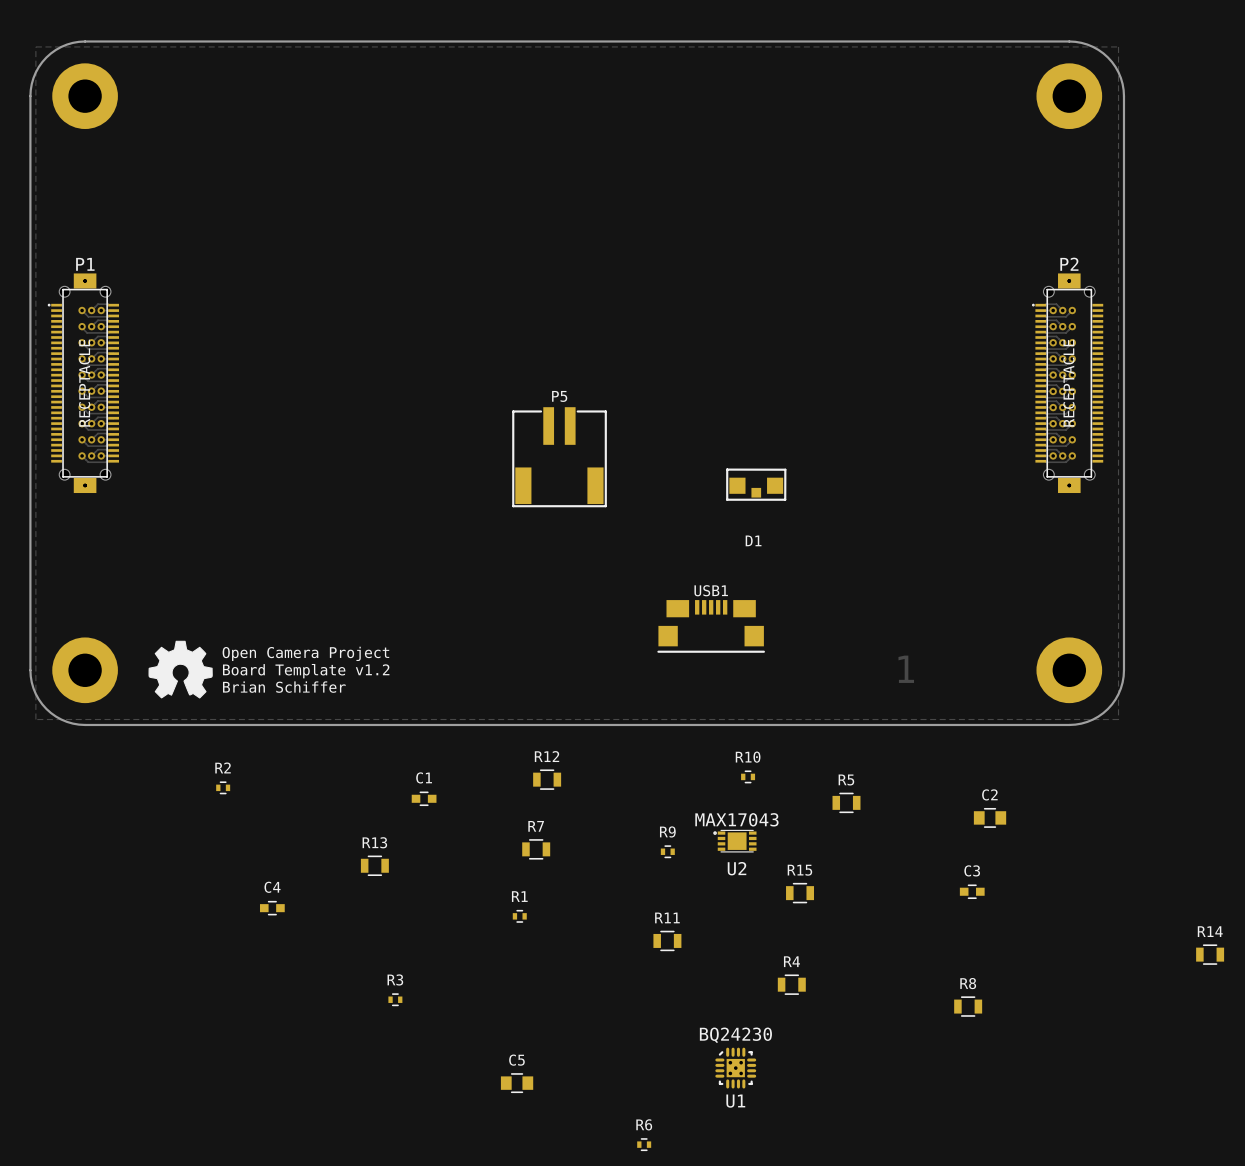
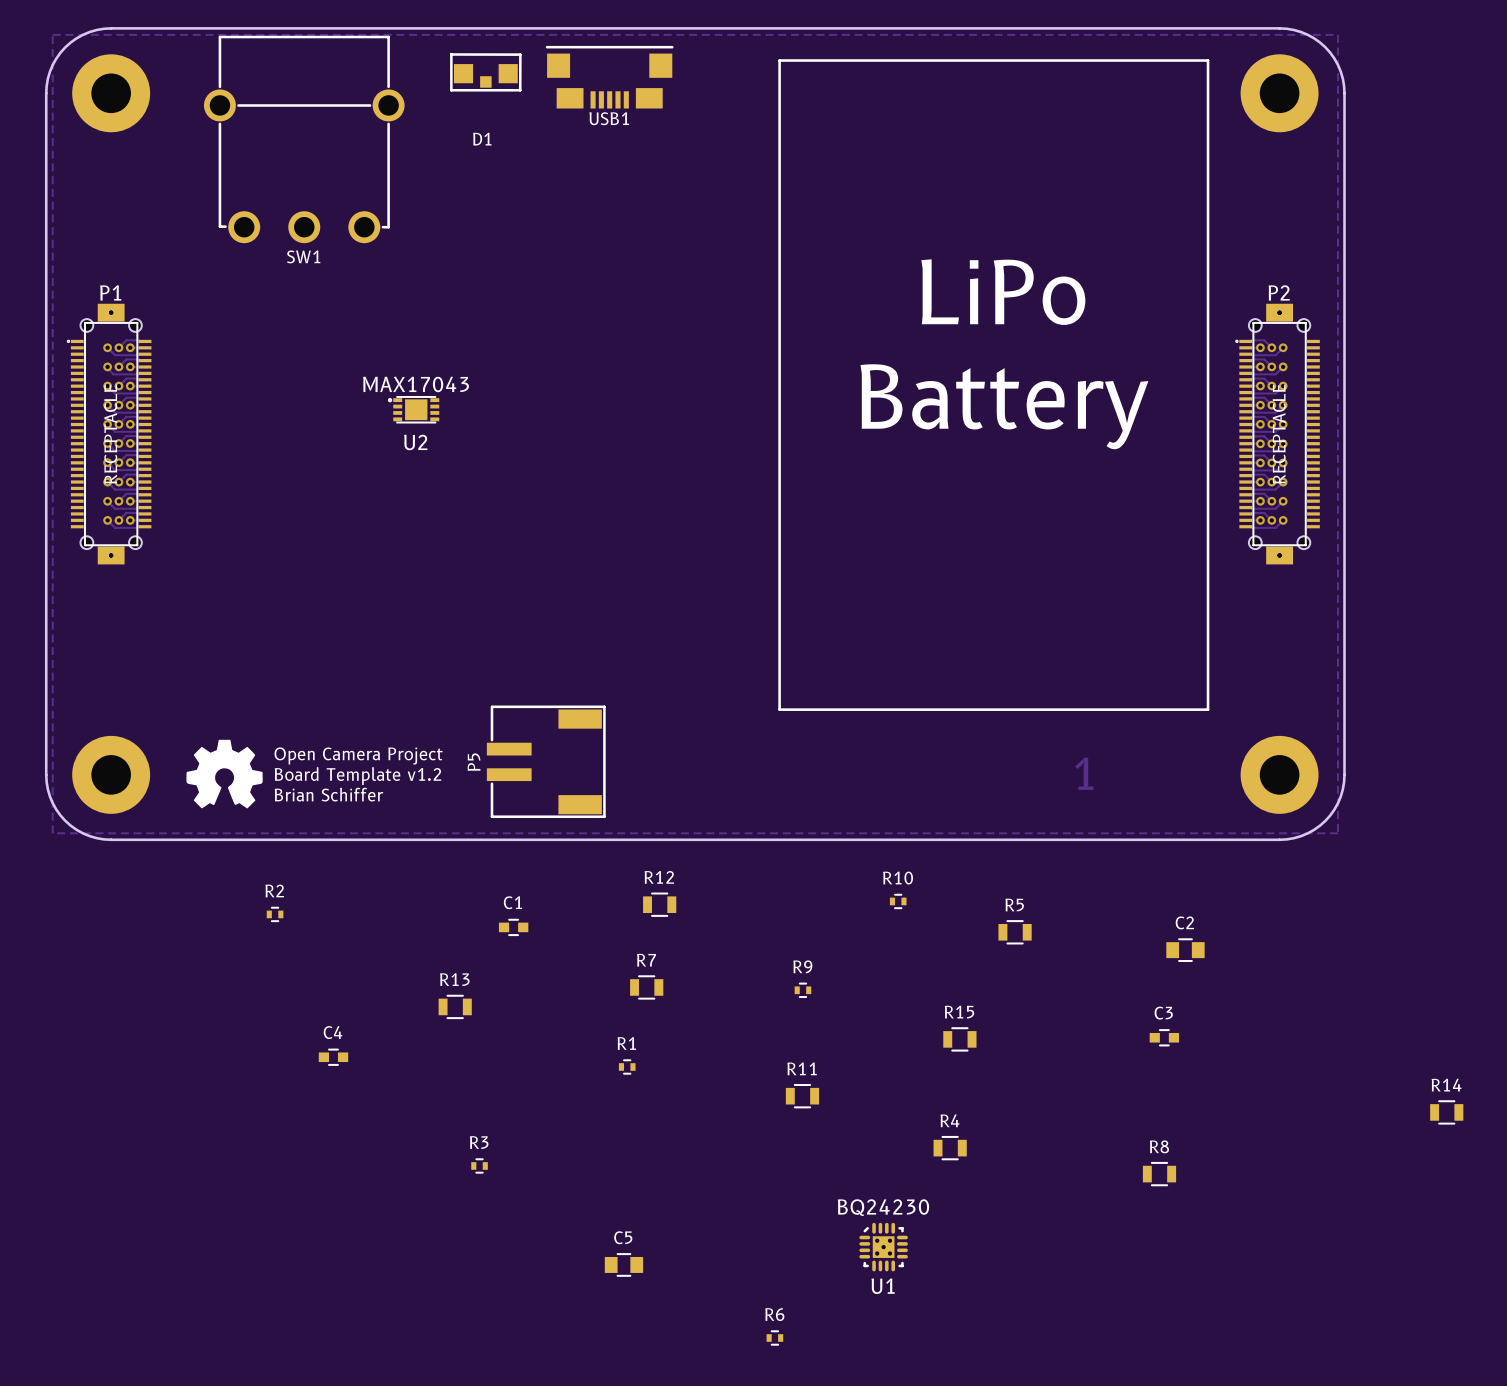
line: none -> (779, 60) (779, 709) (1208, 709) (1208, 60) (779, 60)
SW1: none -> (304, 139)
text: none -> LiPo (1003, 292)
text: none -> Battery (1004, 406)
P5 rotation: 0° (559, 457) -> 90° counterclockwise (546, 761)
P5 position: (559, 457) -> (546, 761)
D1 position: (756, 484) -> (485, 72)
USB1 rotation: 0° (711, 626) -> 180° (609, 77)
USB1 position: (711, 626) -> (609, 77)
U2 position: (734, 841) -> (413, 409)

